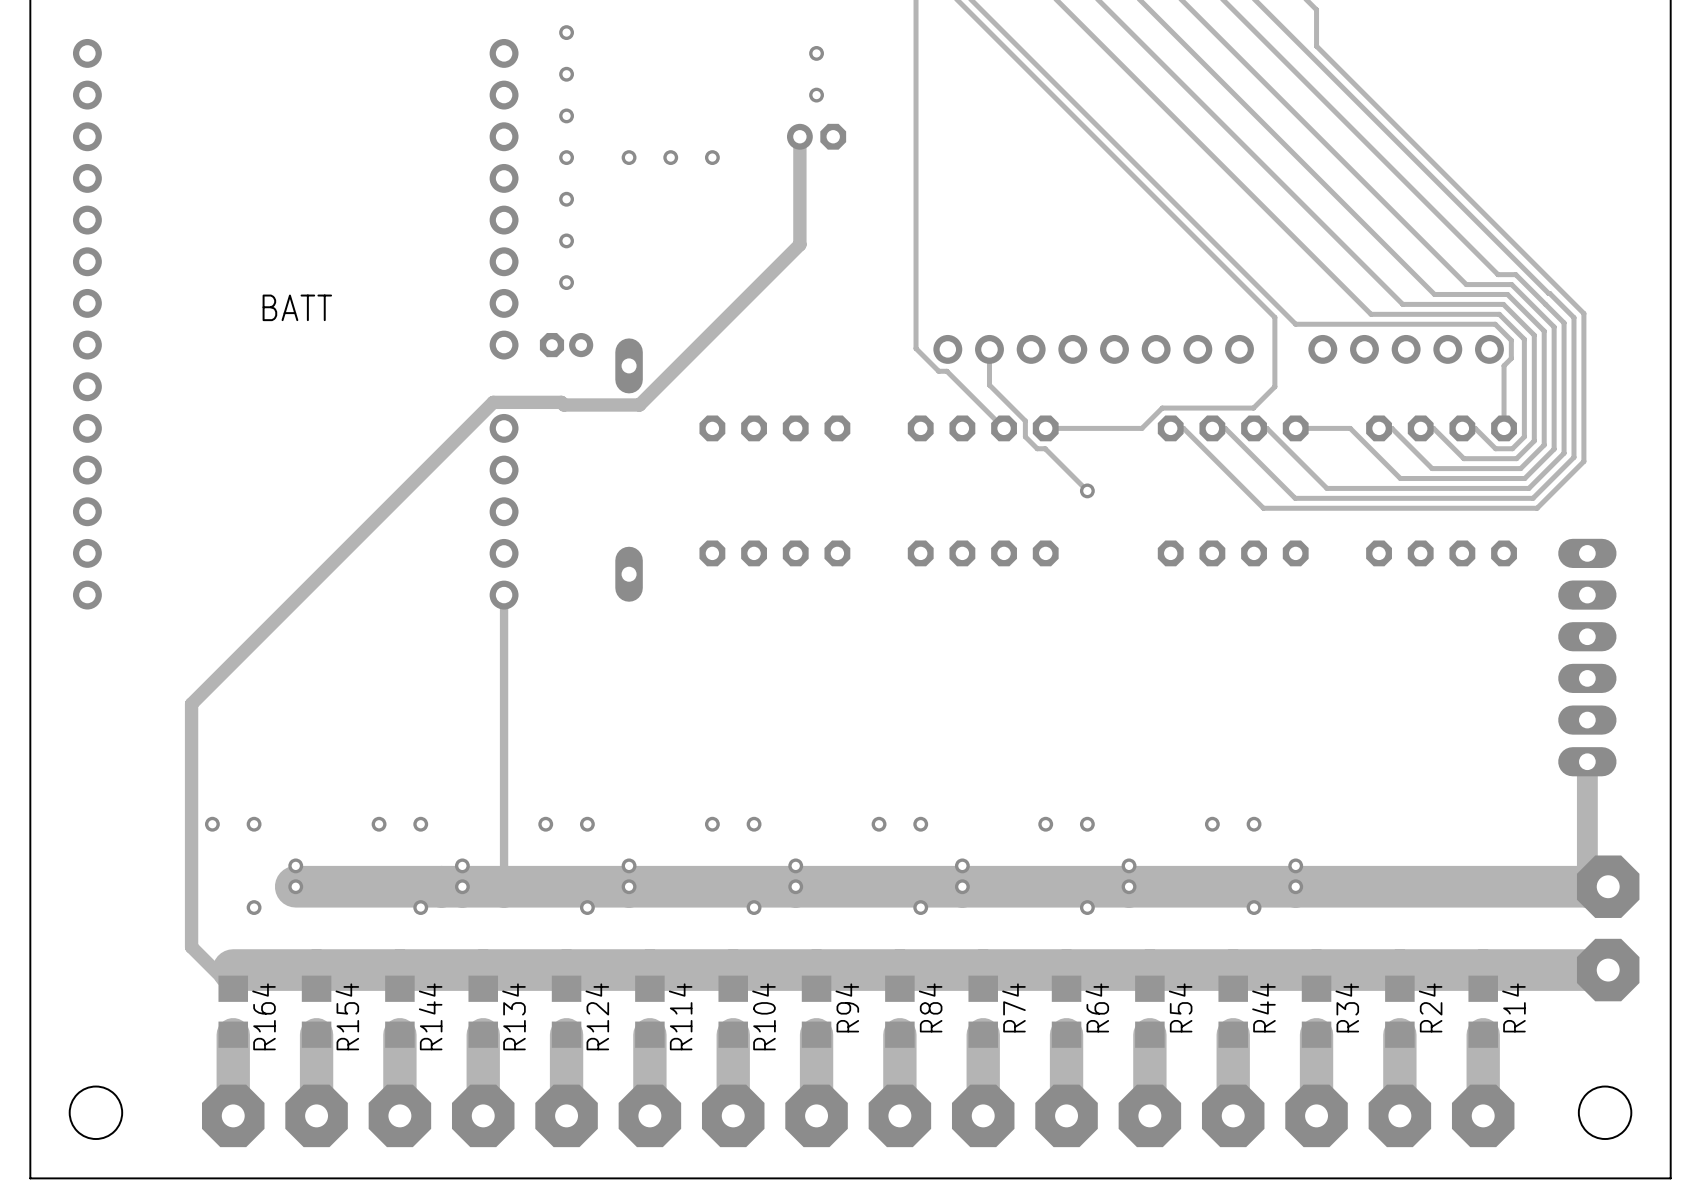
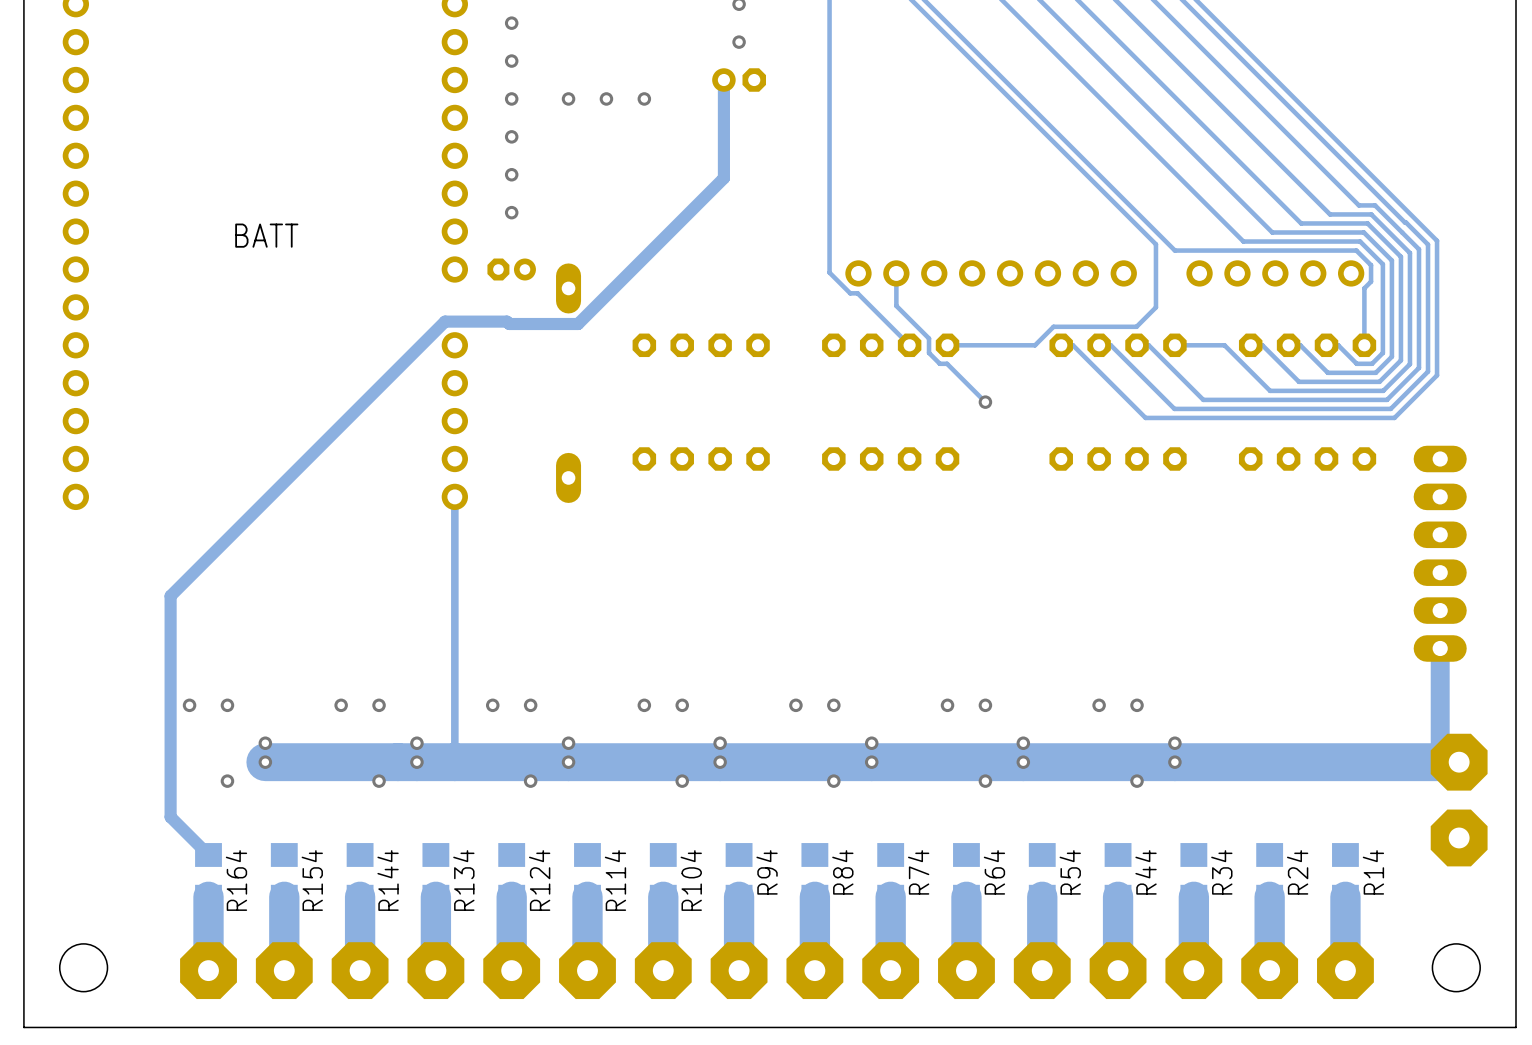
track: (1608, 970) (233, 970) (233, 988) -> none

